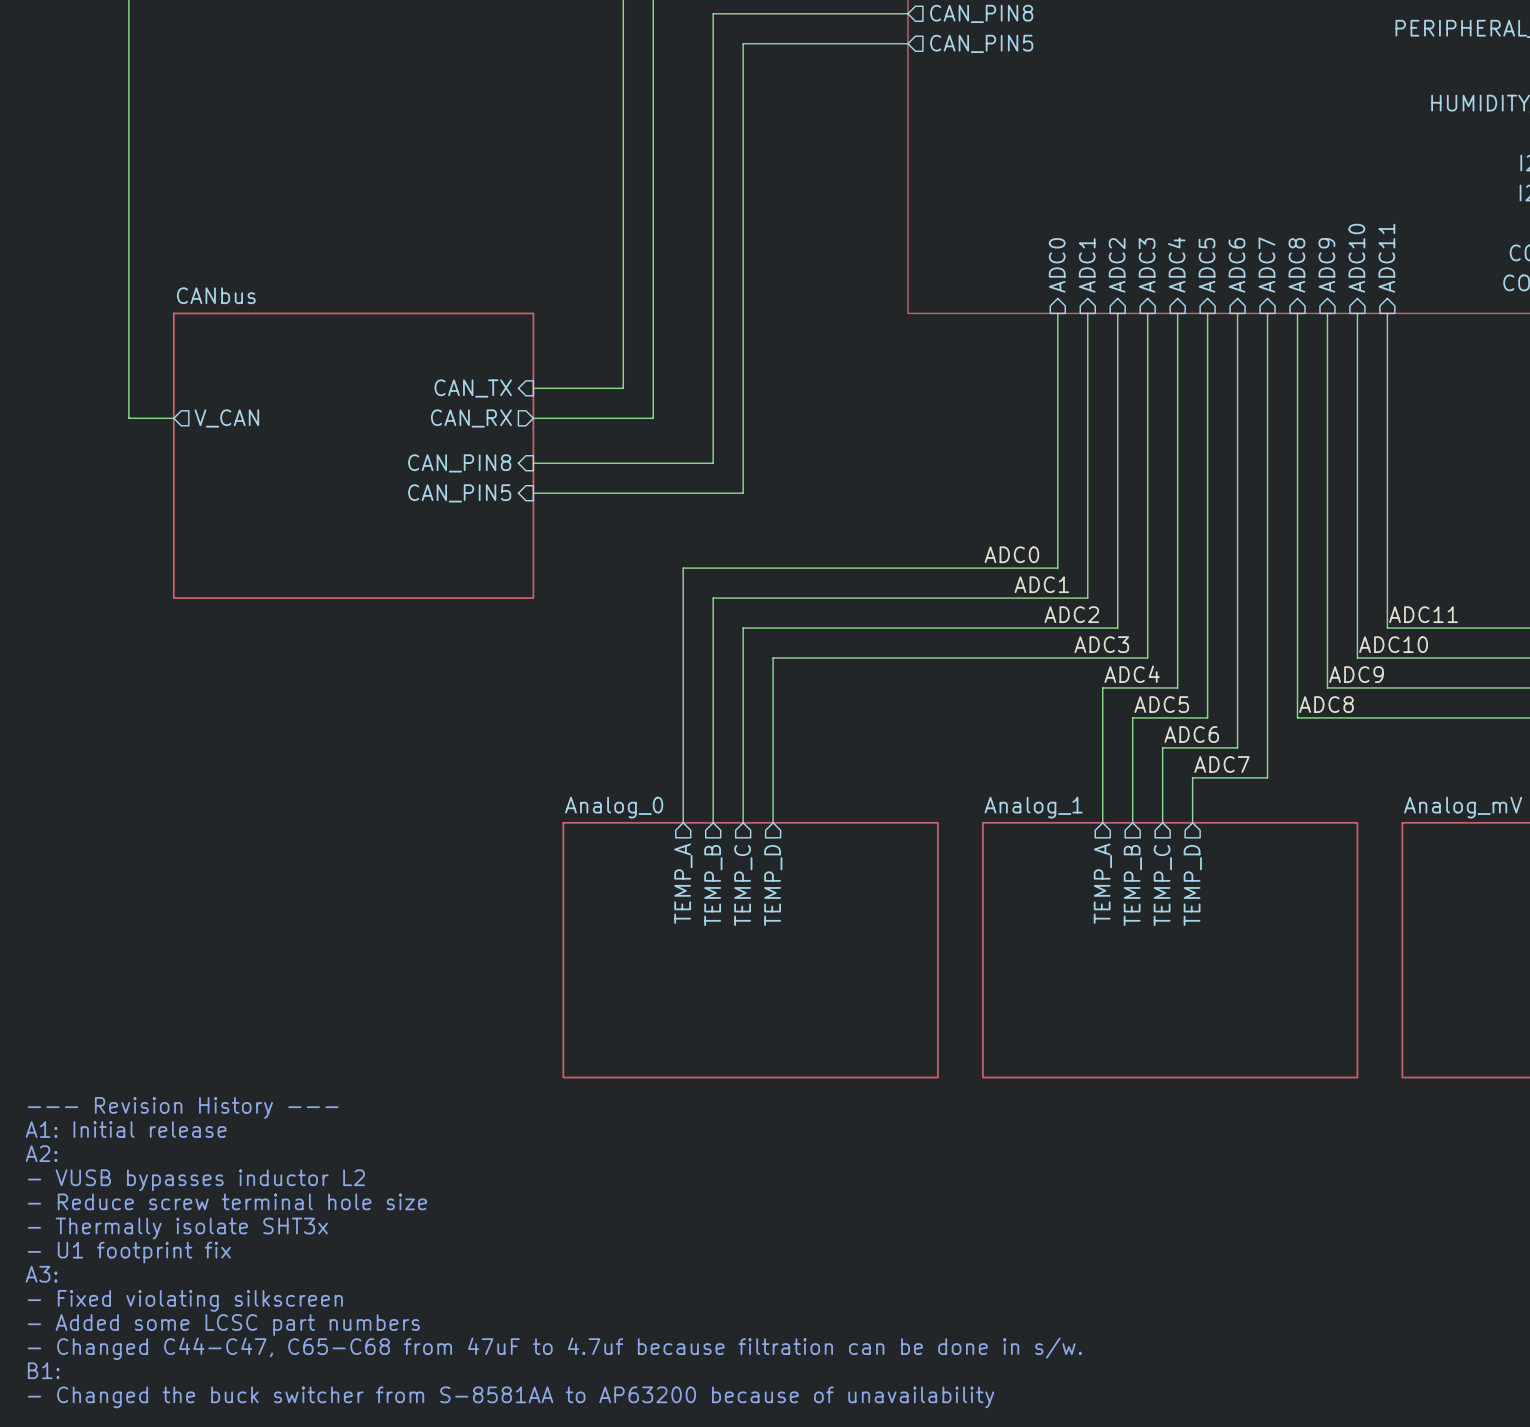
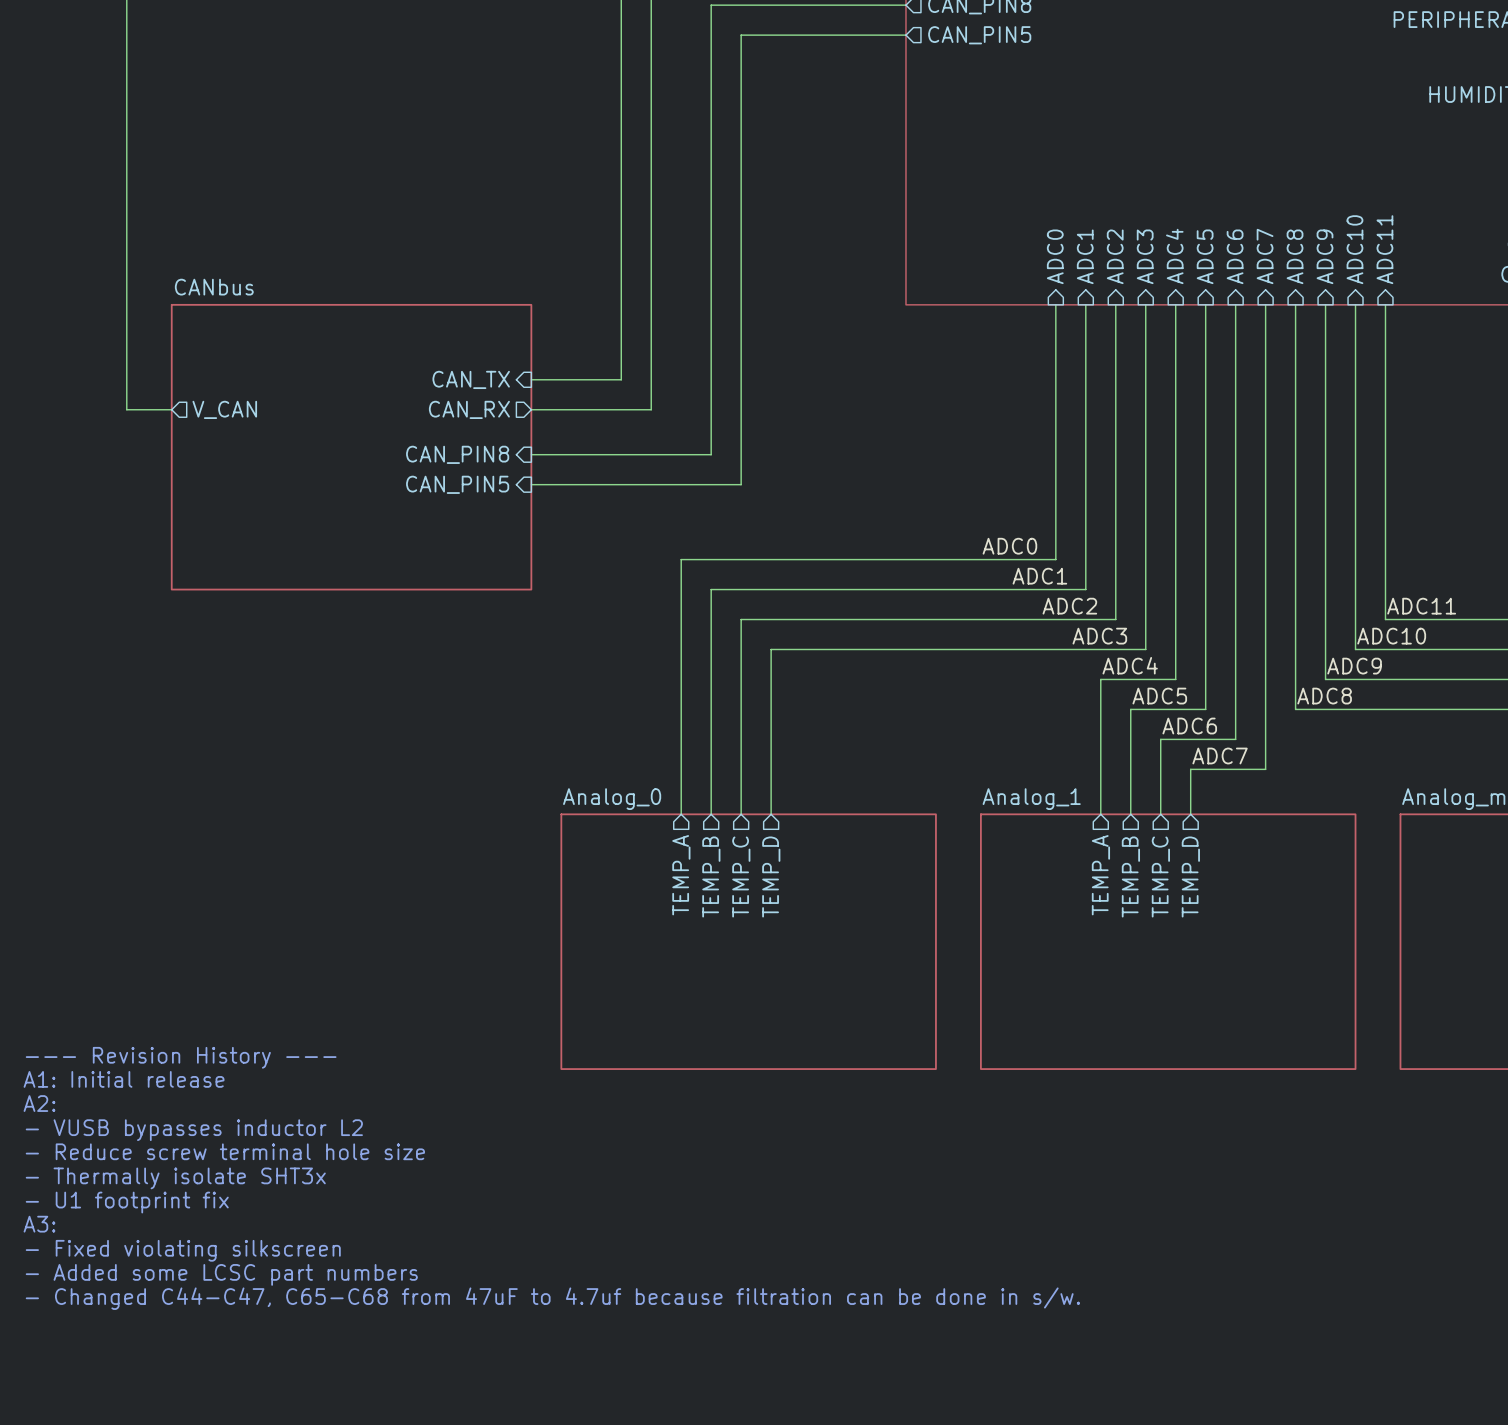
text position: --- Revision History --- (183, 1107) -> --- Revision History --- (181, 1057)
text position: A1: Initial release (126, 1129) -> A1: Initial release (124, 1079)
text position: A2: (41, 1153) -> A2: (39, 1103)
text position: - VUSB bypasses inductor L2 (196, 1180) -> - VUSB bypasses inductor L2 (194, 1130)
text position: - Reduce screw terminal hole size (227, 1201) -> - Reduce screw terminal hole size (225, 1151)
text position: - Thermally isolate SHT3x (177, 1228) -> - Thermally isolate SHT3x (175, 1178)
text position: - U1 footprint fix (129, 1252) -> - U1 footprint fix (127, 1202)
text position: A3: (41, 1274) -> A3: (39, 1224)
text position: - Fixed violating silkscreen (185, 1300) -> - Fixed violating silkscreen (183, 1250)
text position: - Added some LCSC part numbers (223, 1324) -> - Added some LCSC part numbers (221, 1274)
text position: - Changed C44-C47, C65-C68 from 47uF to 4.7uf because filtration can be done in s/w. (554, 1348) -> - Changed C44-C47, C65-C68 from 47uF to 4.7uf because filtration can be done in s/w. (552, 1298)
text: B1: (43, 1370) -> none
text: - Changed the buck switcher from S-8581AA to AP63200 because of unavailability (511, 1397) -> none

